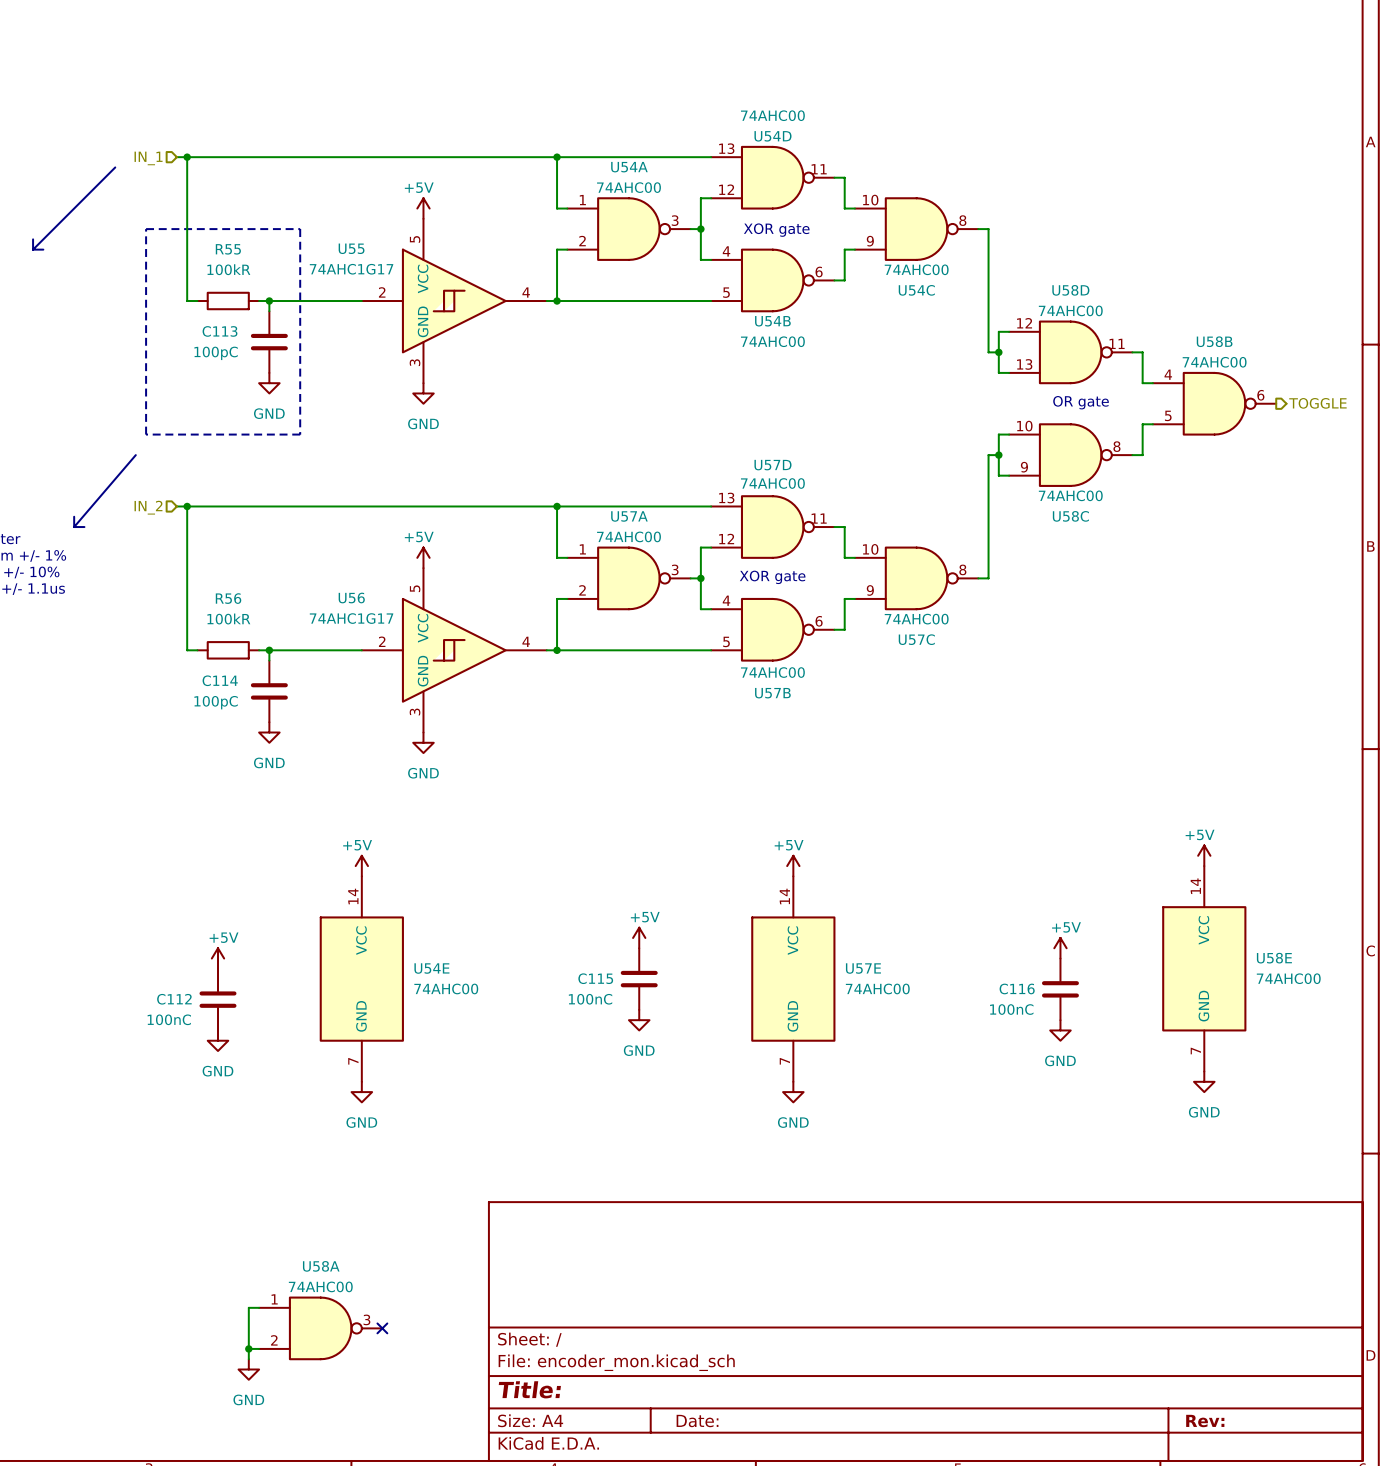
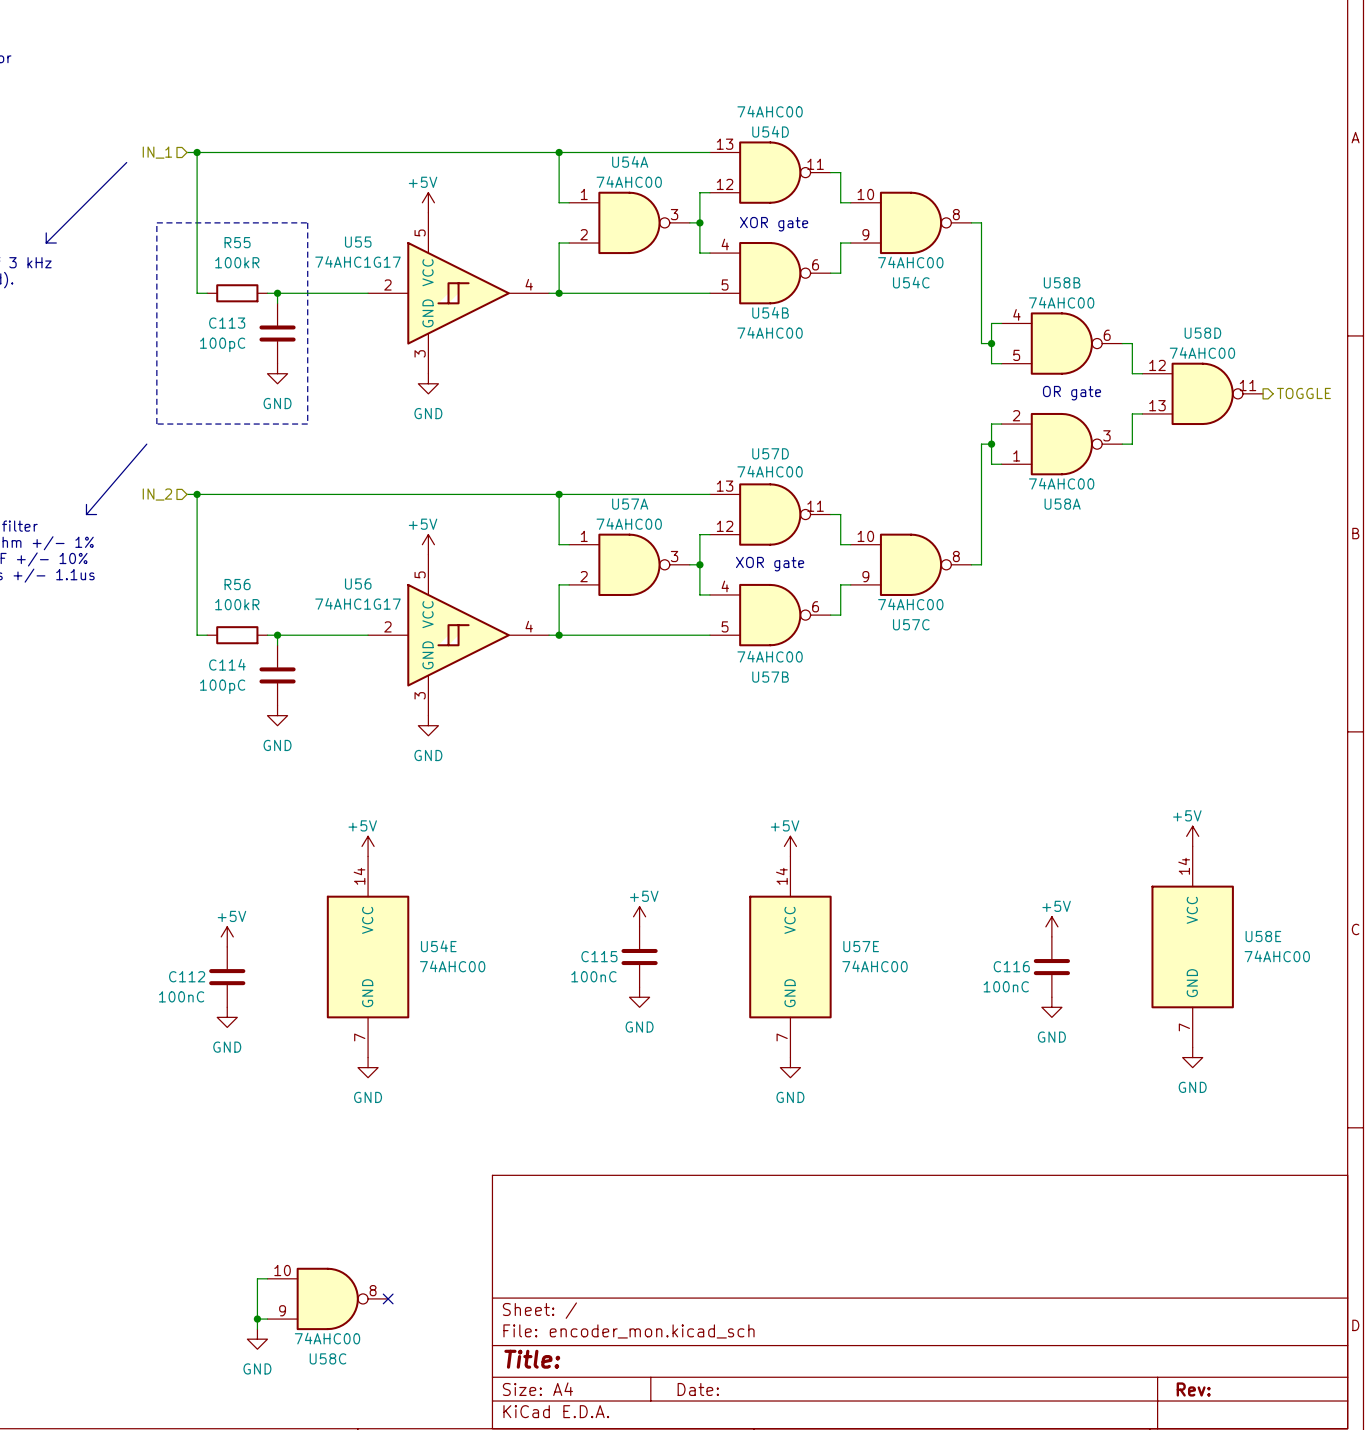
U58D position: (1070, 352) -> (1202, 393)
U58B position: (1214, 403) -> (1061, 343)
U58C position: (1070, 455) -> (327, 1298)
U58A flip: as is (320, 1328) -> up-down (1061, 444)
U58A position: (320, 1328) -> (1061, 444)

